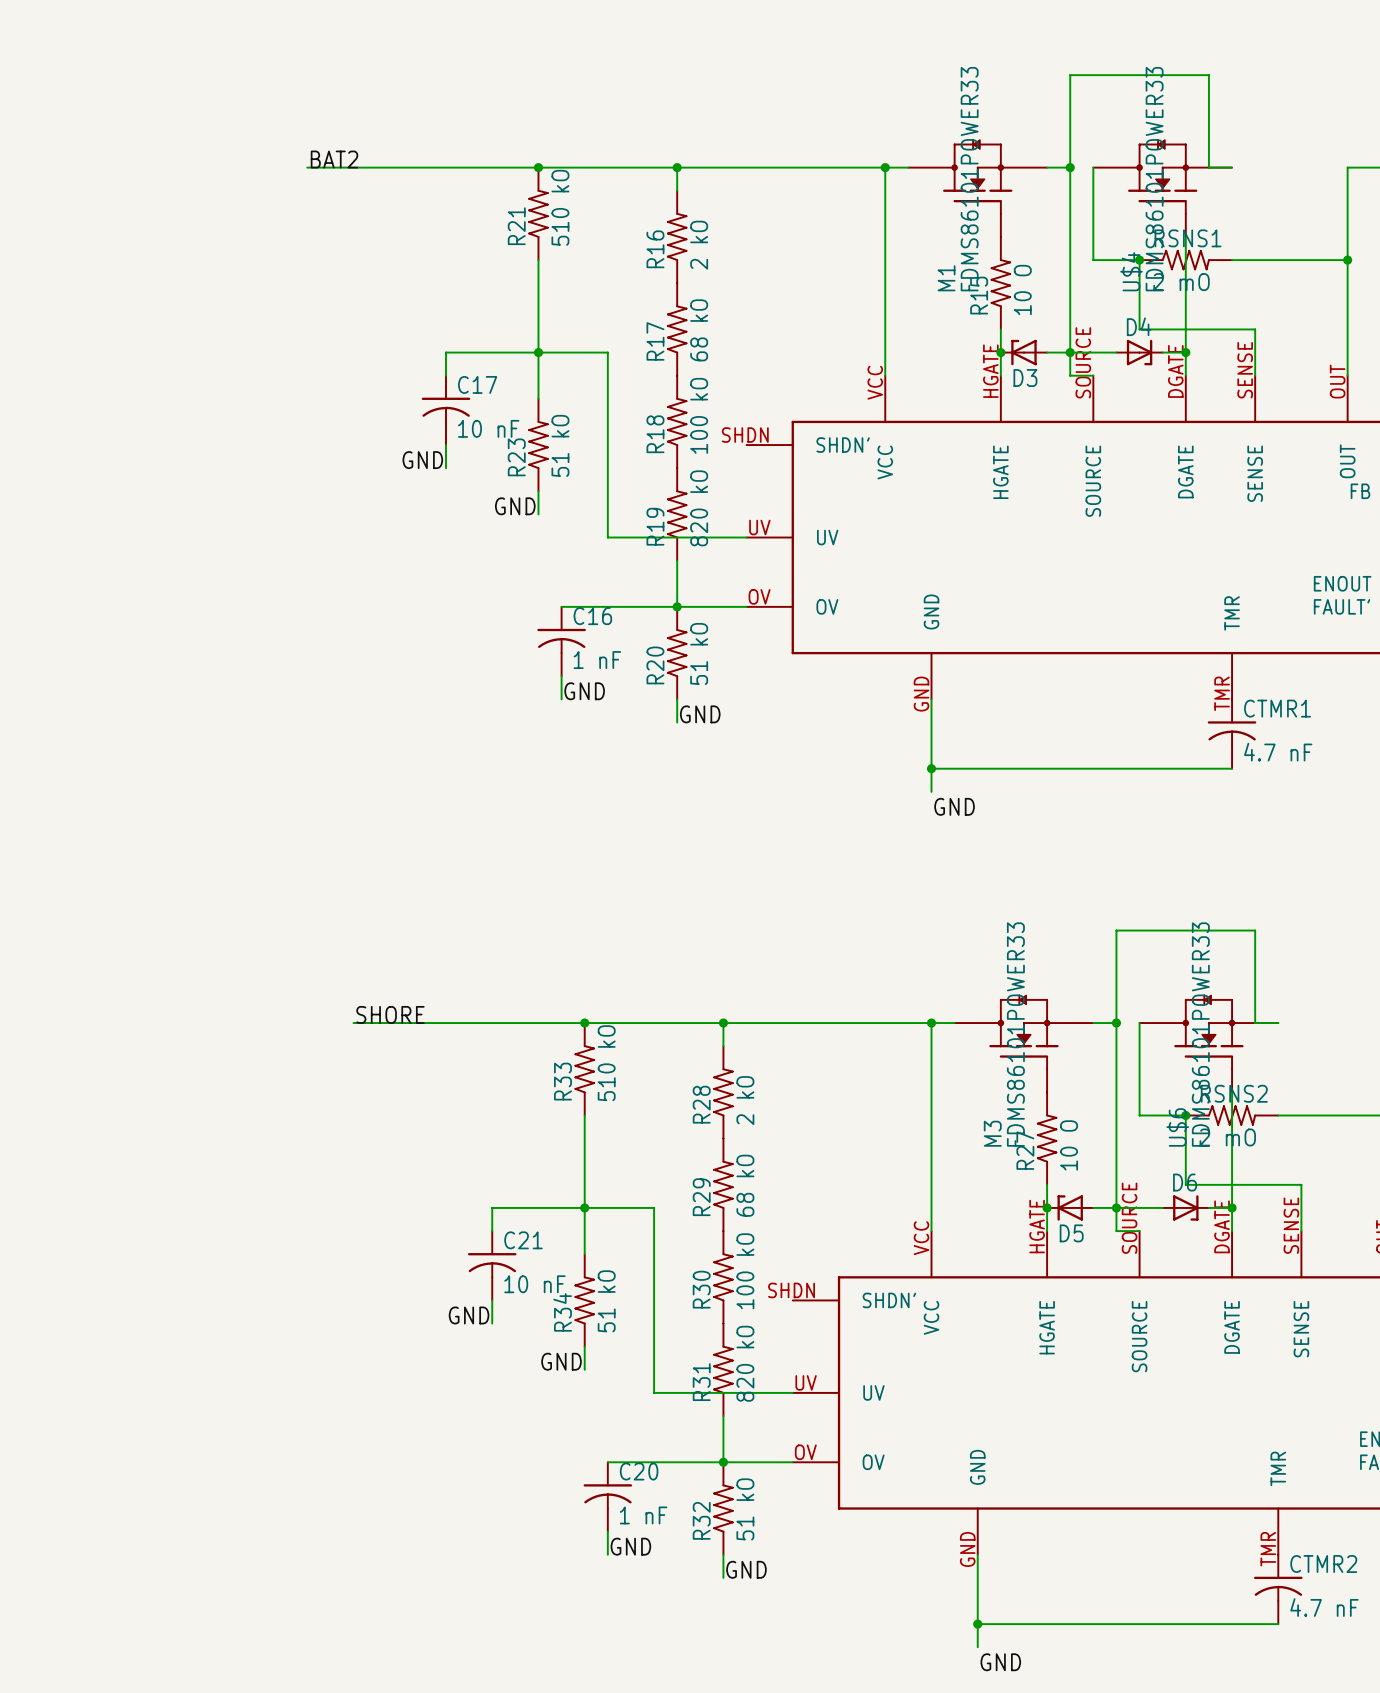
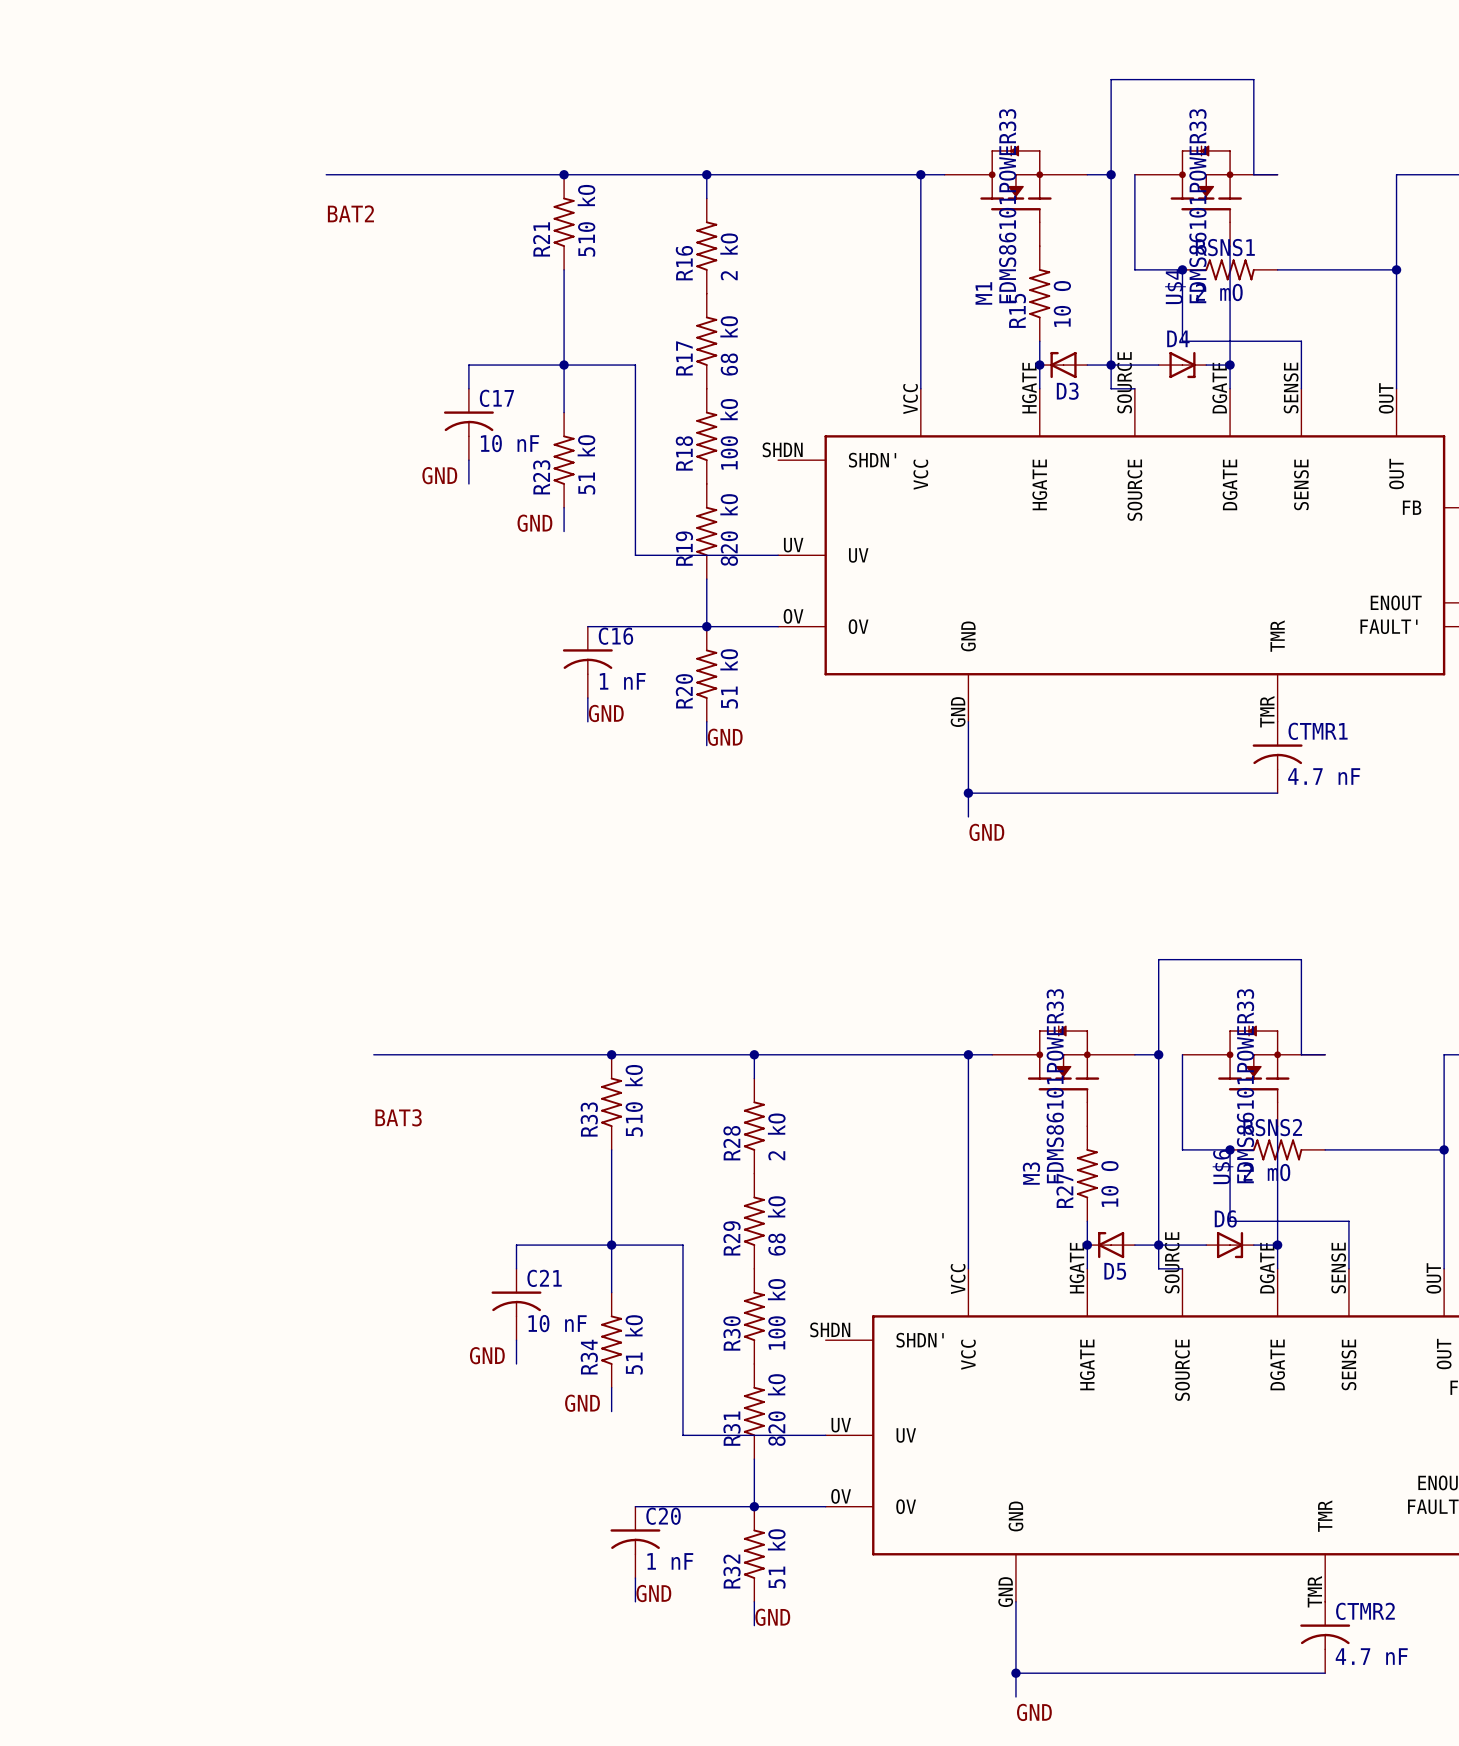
label position: BAT2 (334, 159) -> BAT2 (350, 213)
label: SHORE (390, 1014) -> none
label: none -> BAT3 (398, 1117)

